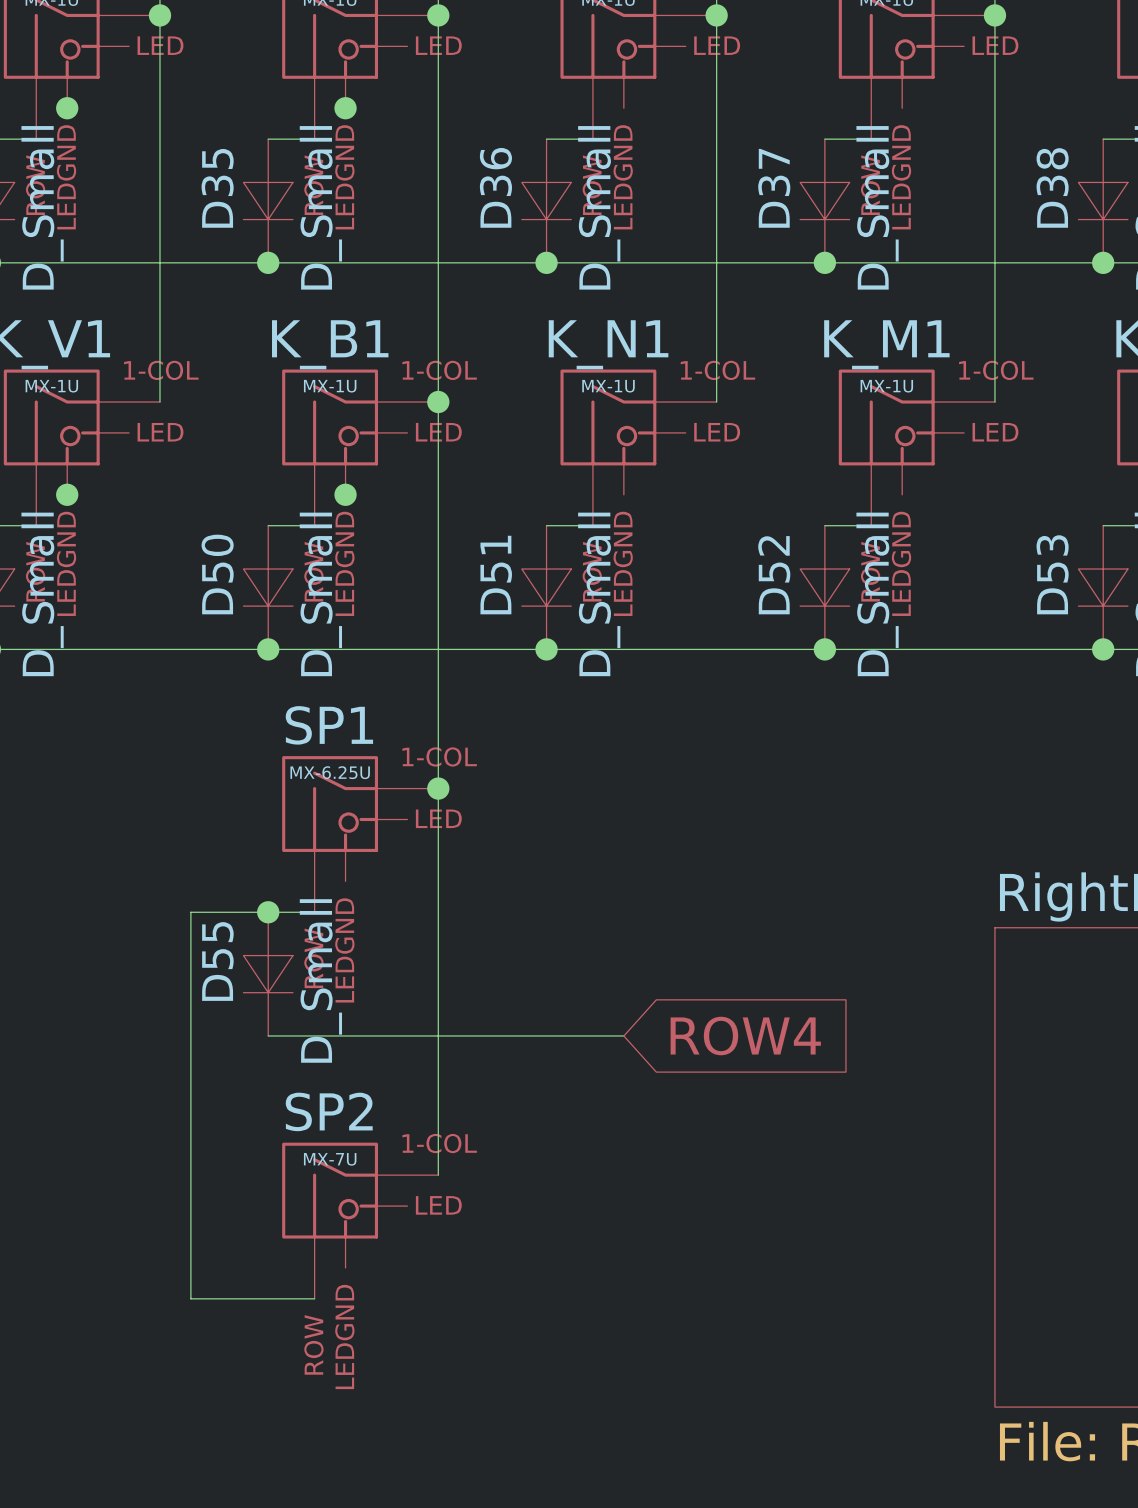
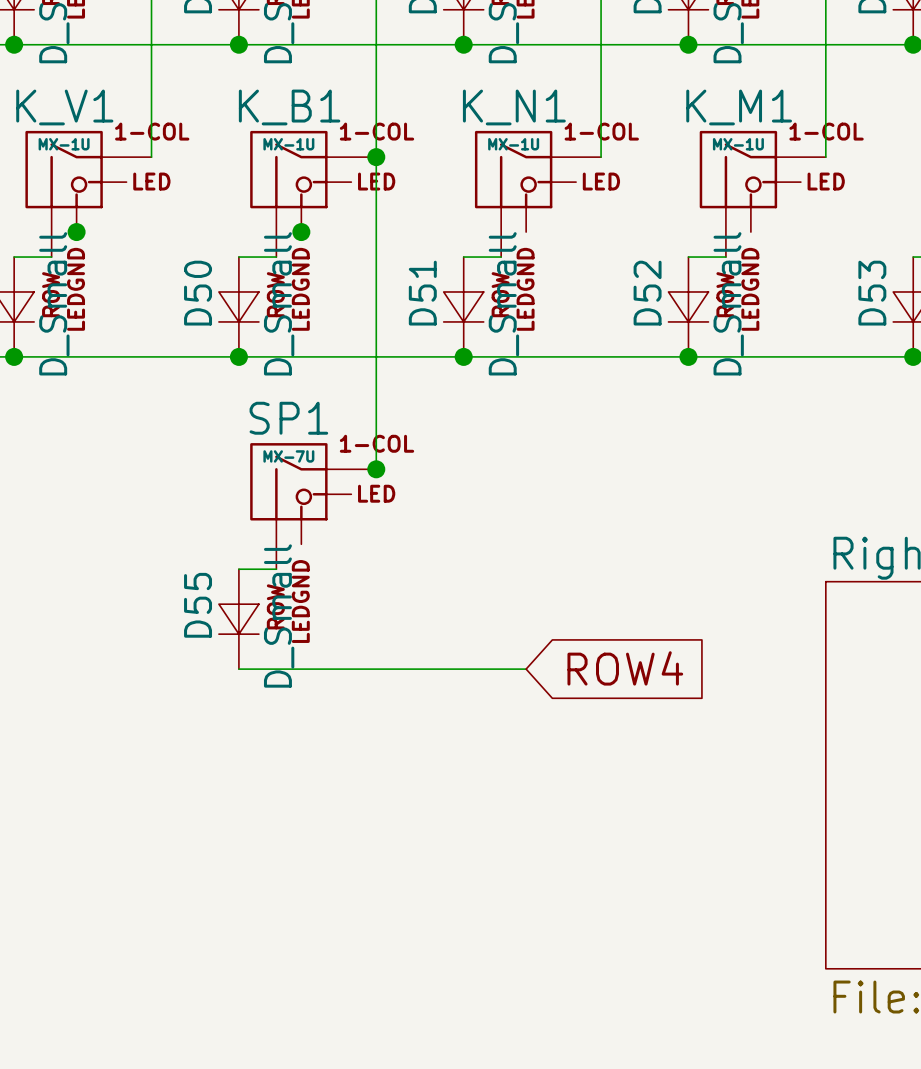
SP1 value: MX-6.25U (330, 772) -> MX-7U (288, 456)
wire: (438, 788) (438, 1175) -> none
wire: (268, 912) (190, 912) (190, 1298) (314, 1298) -> none
junction: (268, 912) -> none
SP2: MX-7U (360, 1220) -> none

